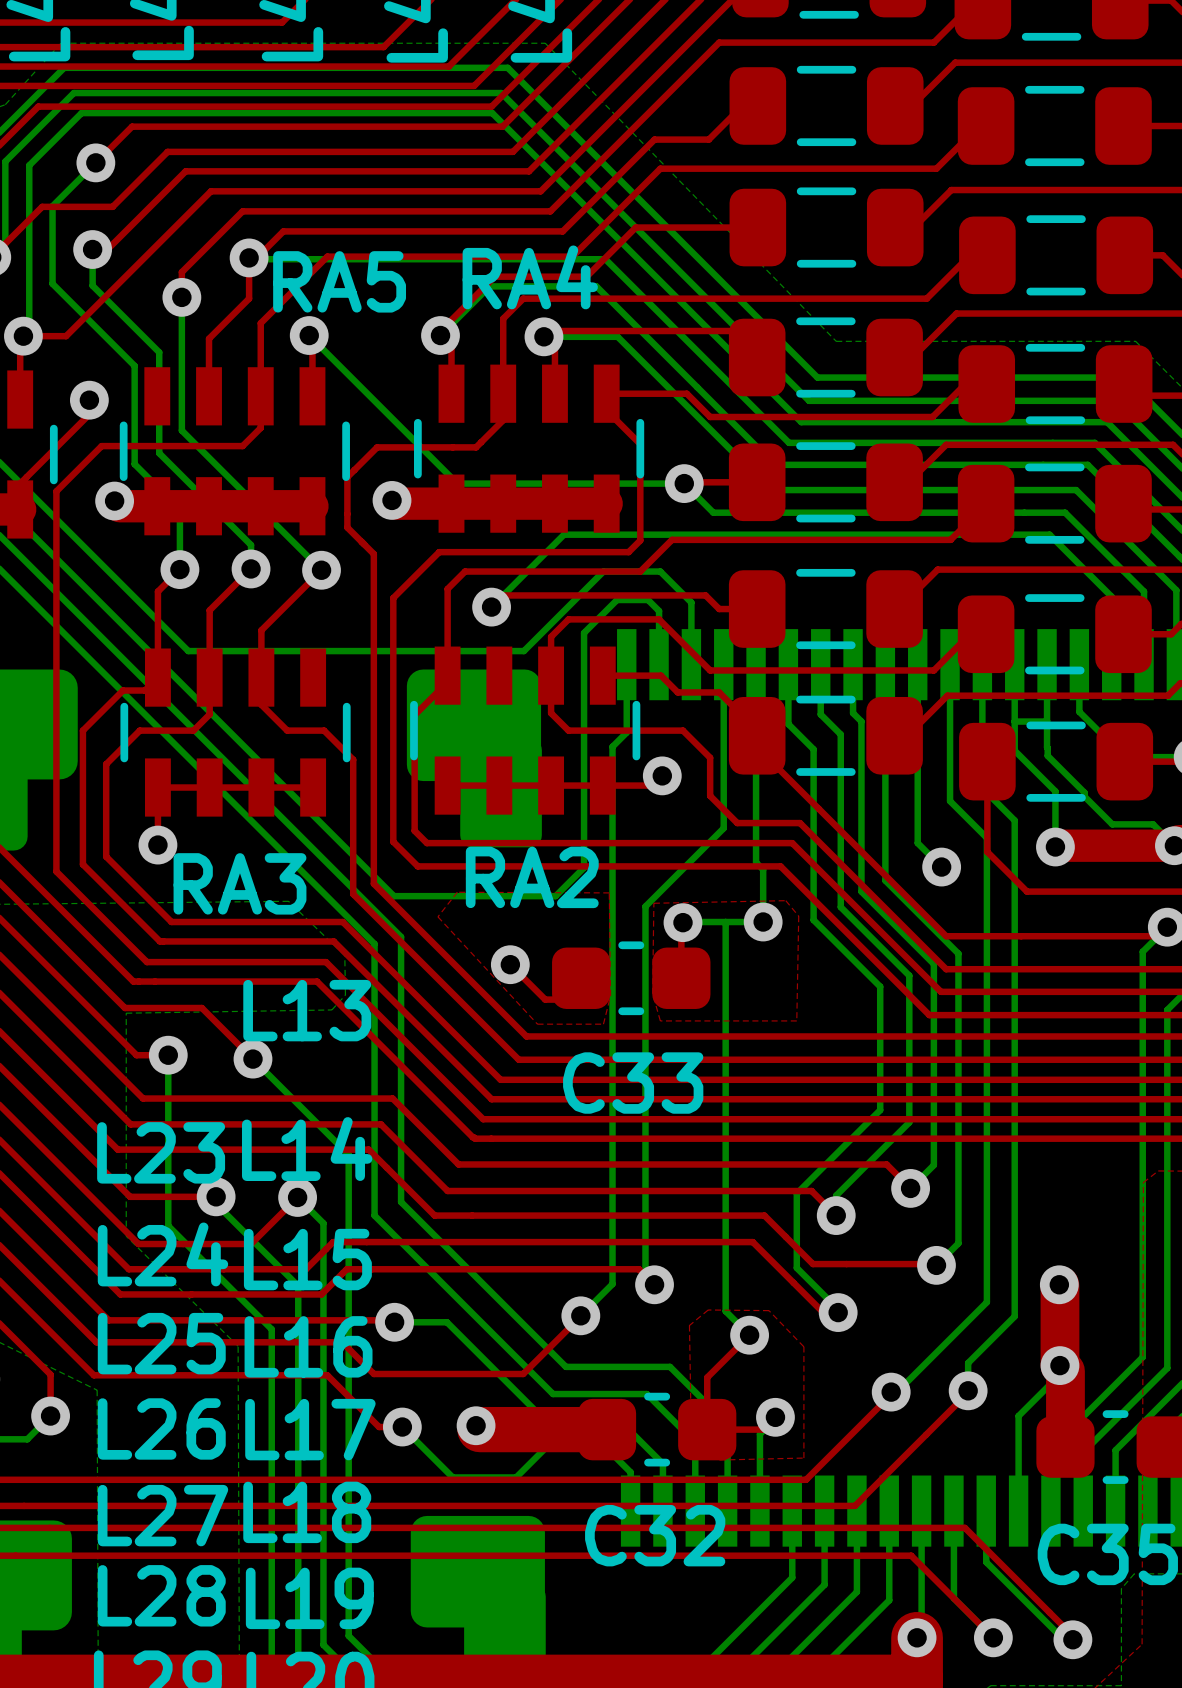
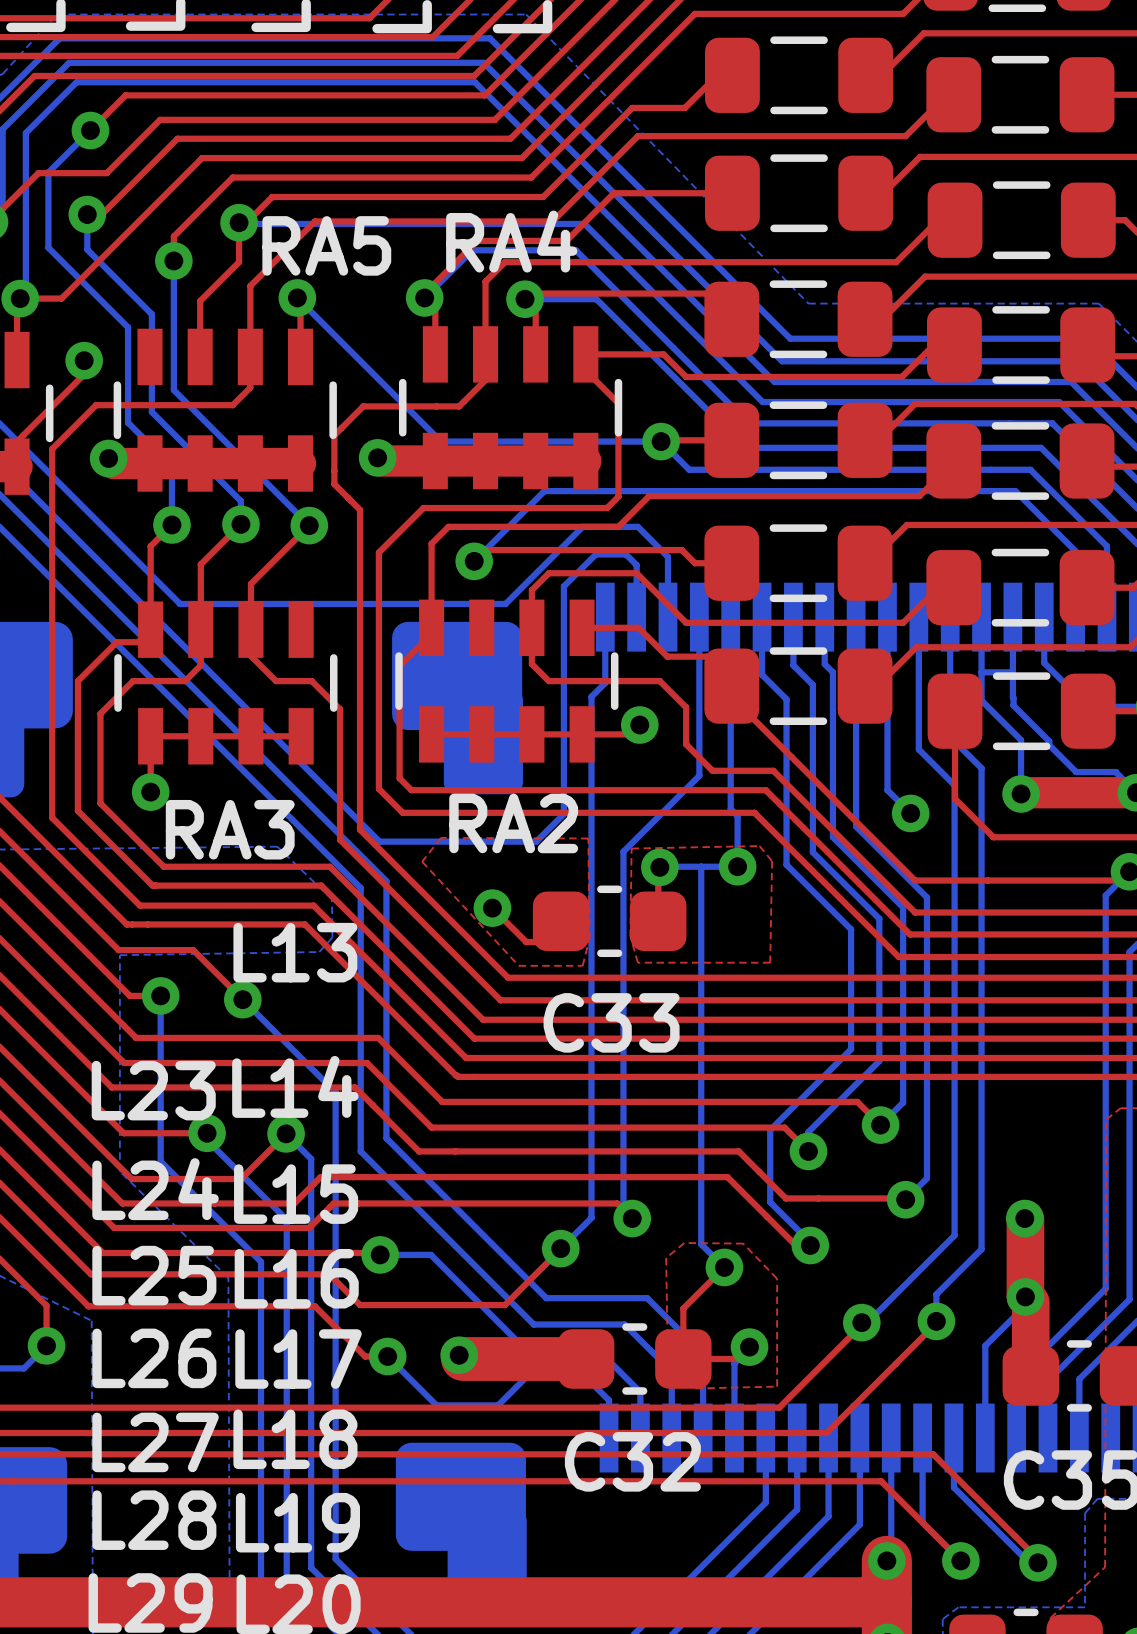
top track: (677, 692) (719, 692) (732, 705) -> (654, 644) (667, 656) (707, 656)

